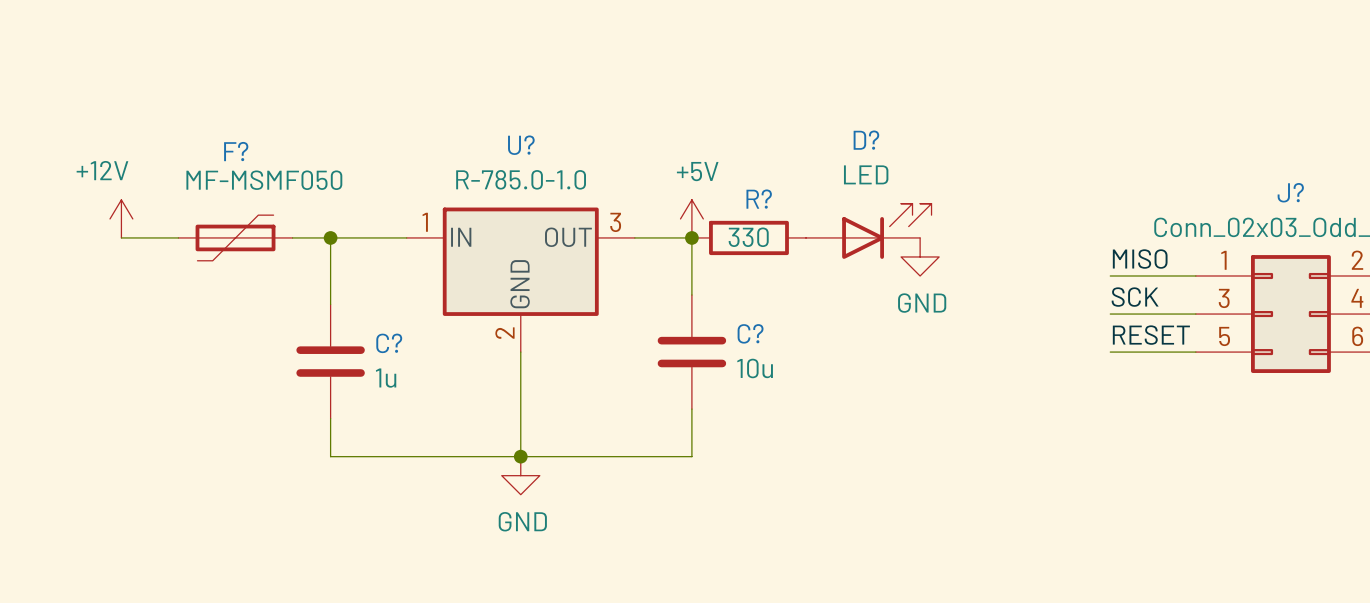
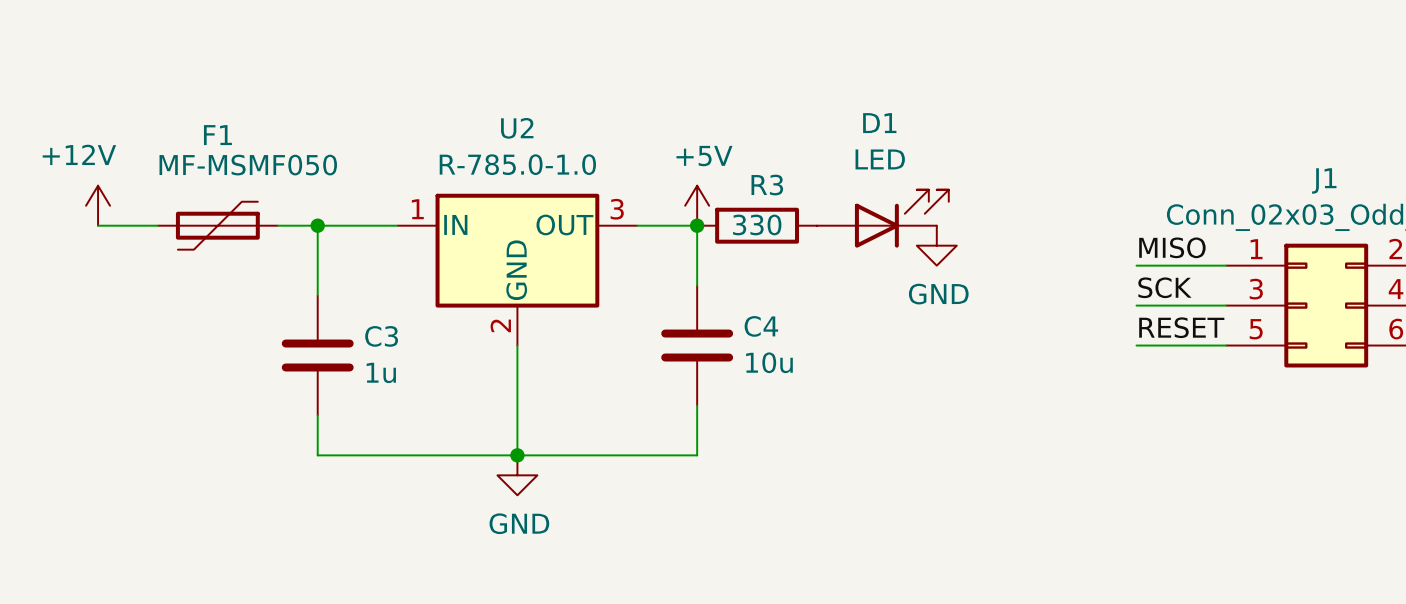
D? name: D? (866, 140) -> D1 (879, 123)
U? name: U? (521, 145) -> U2 (517, 128)
F? name: F? (236, 151) -> F1 (217, 135)
J? name: J? (1290, 192) -> J1 (1324, 180)
R? name: R? (759, 199) -> R3 (767, 185)
C? name: C? (750, 333) -> C4 (761, 326)
C? name: C? (389, 343) -> C3 (381, 336)

